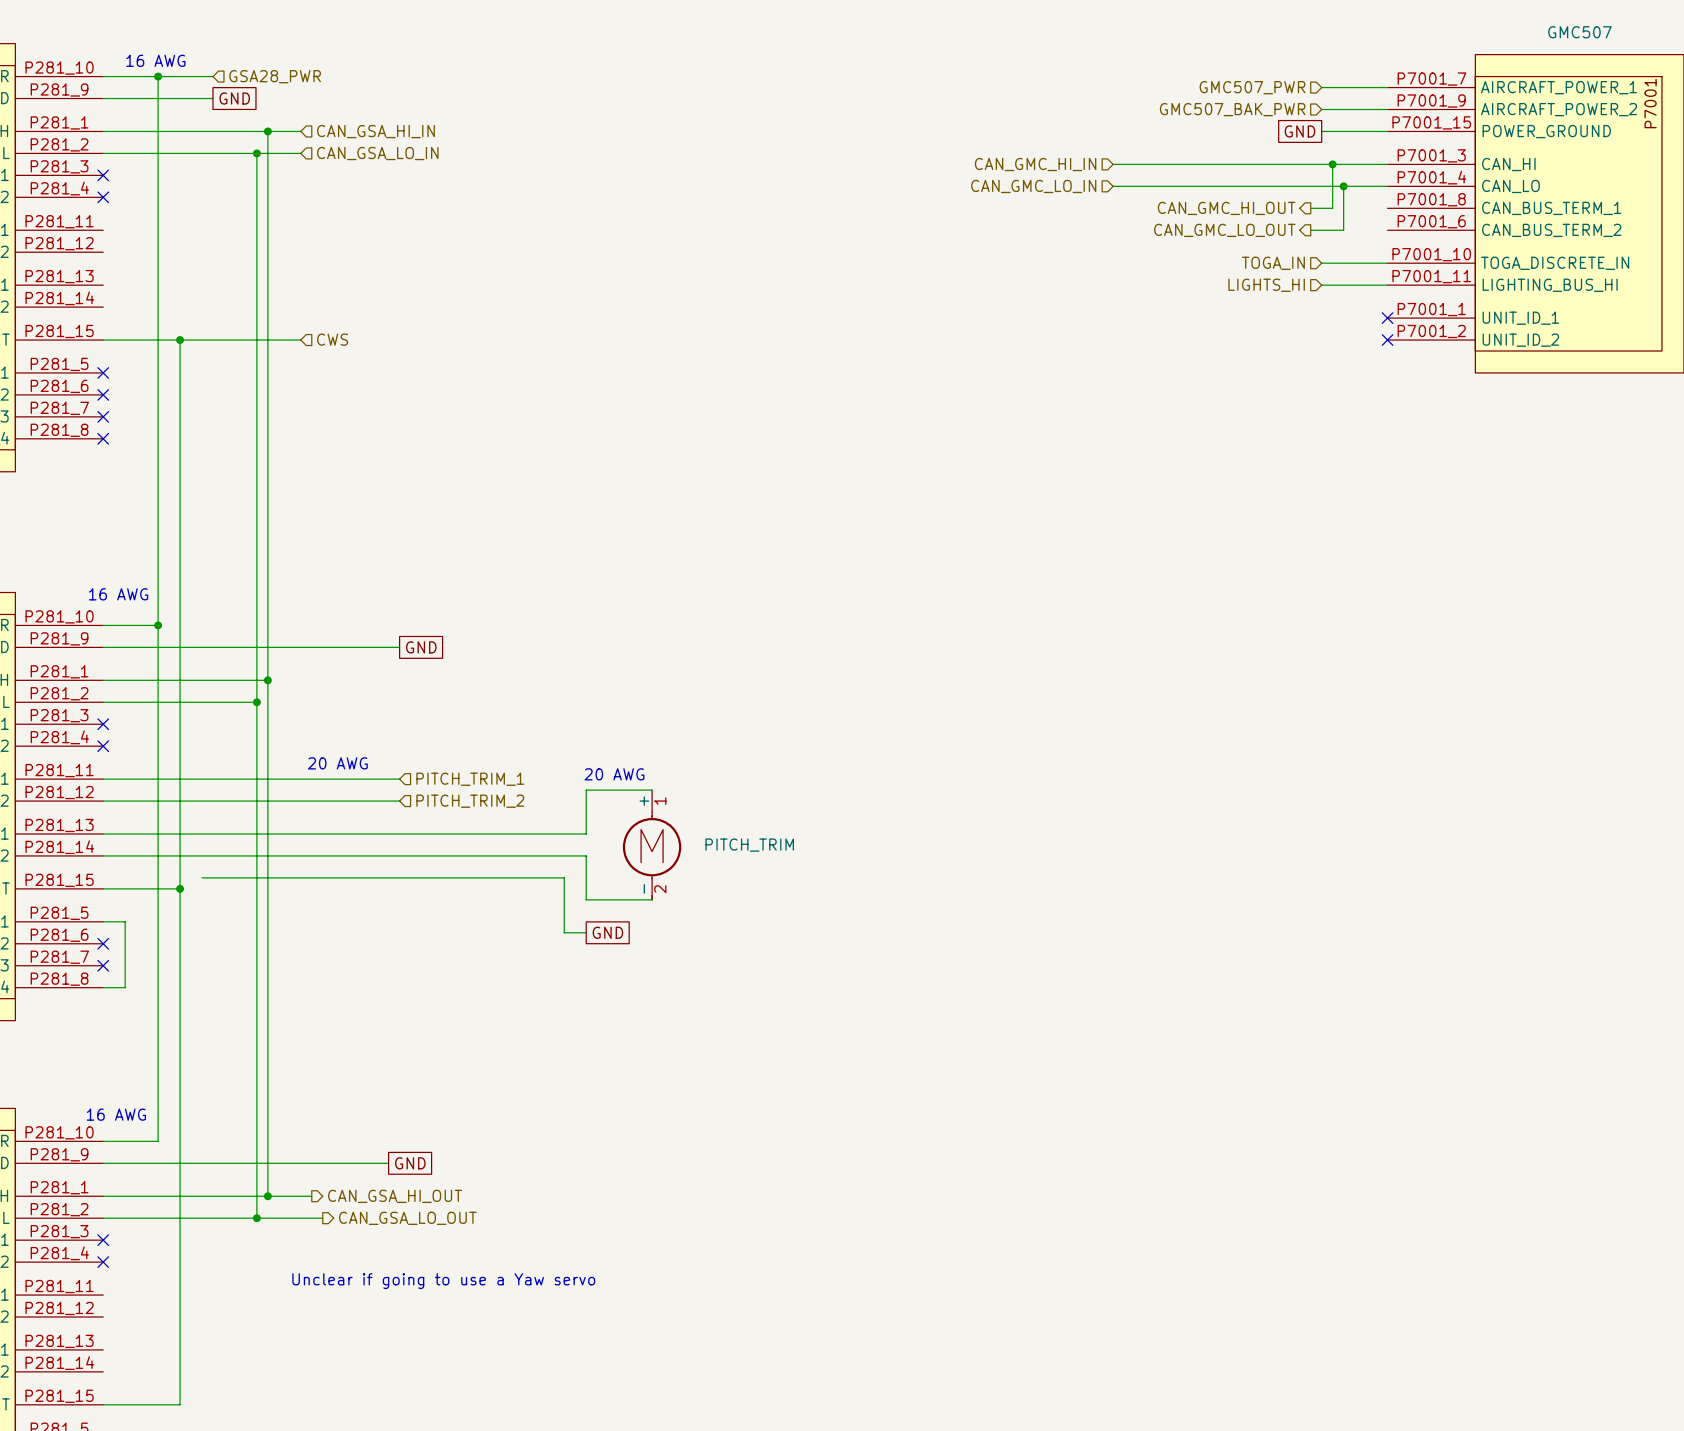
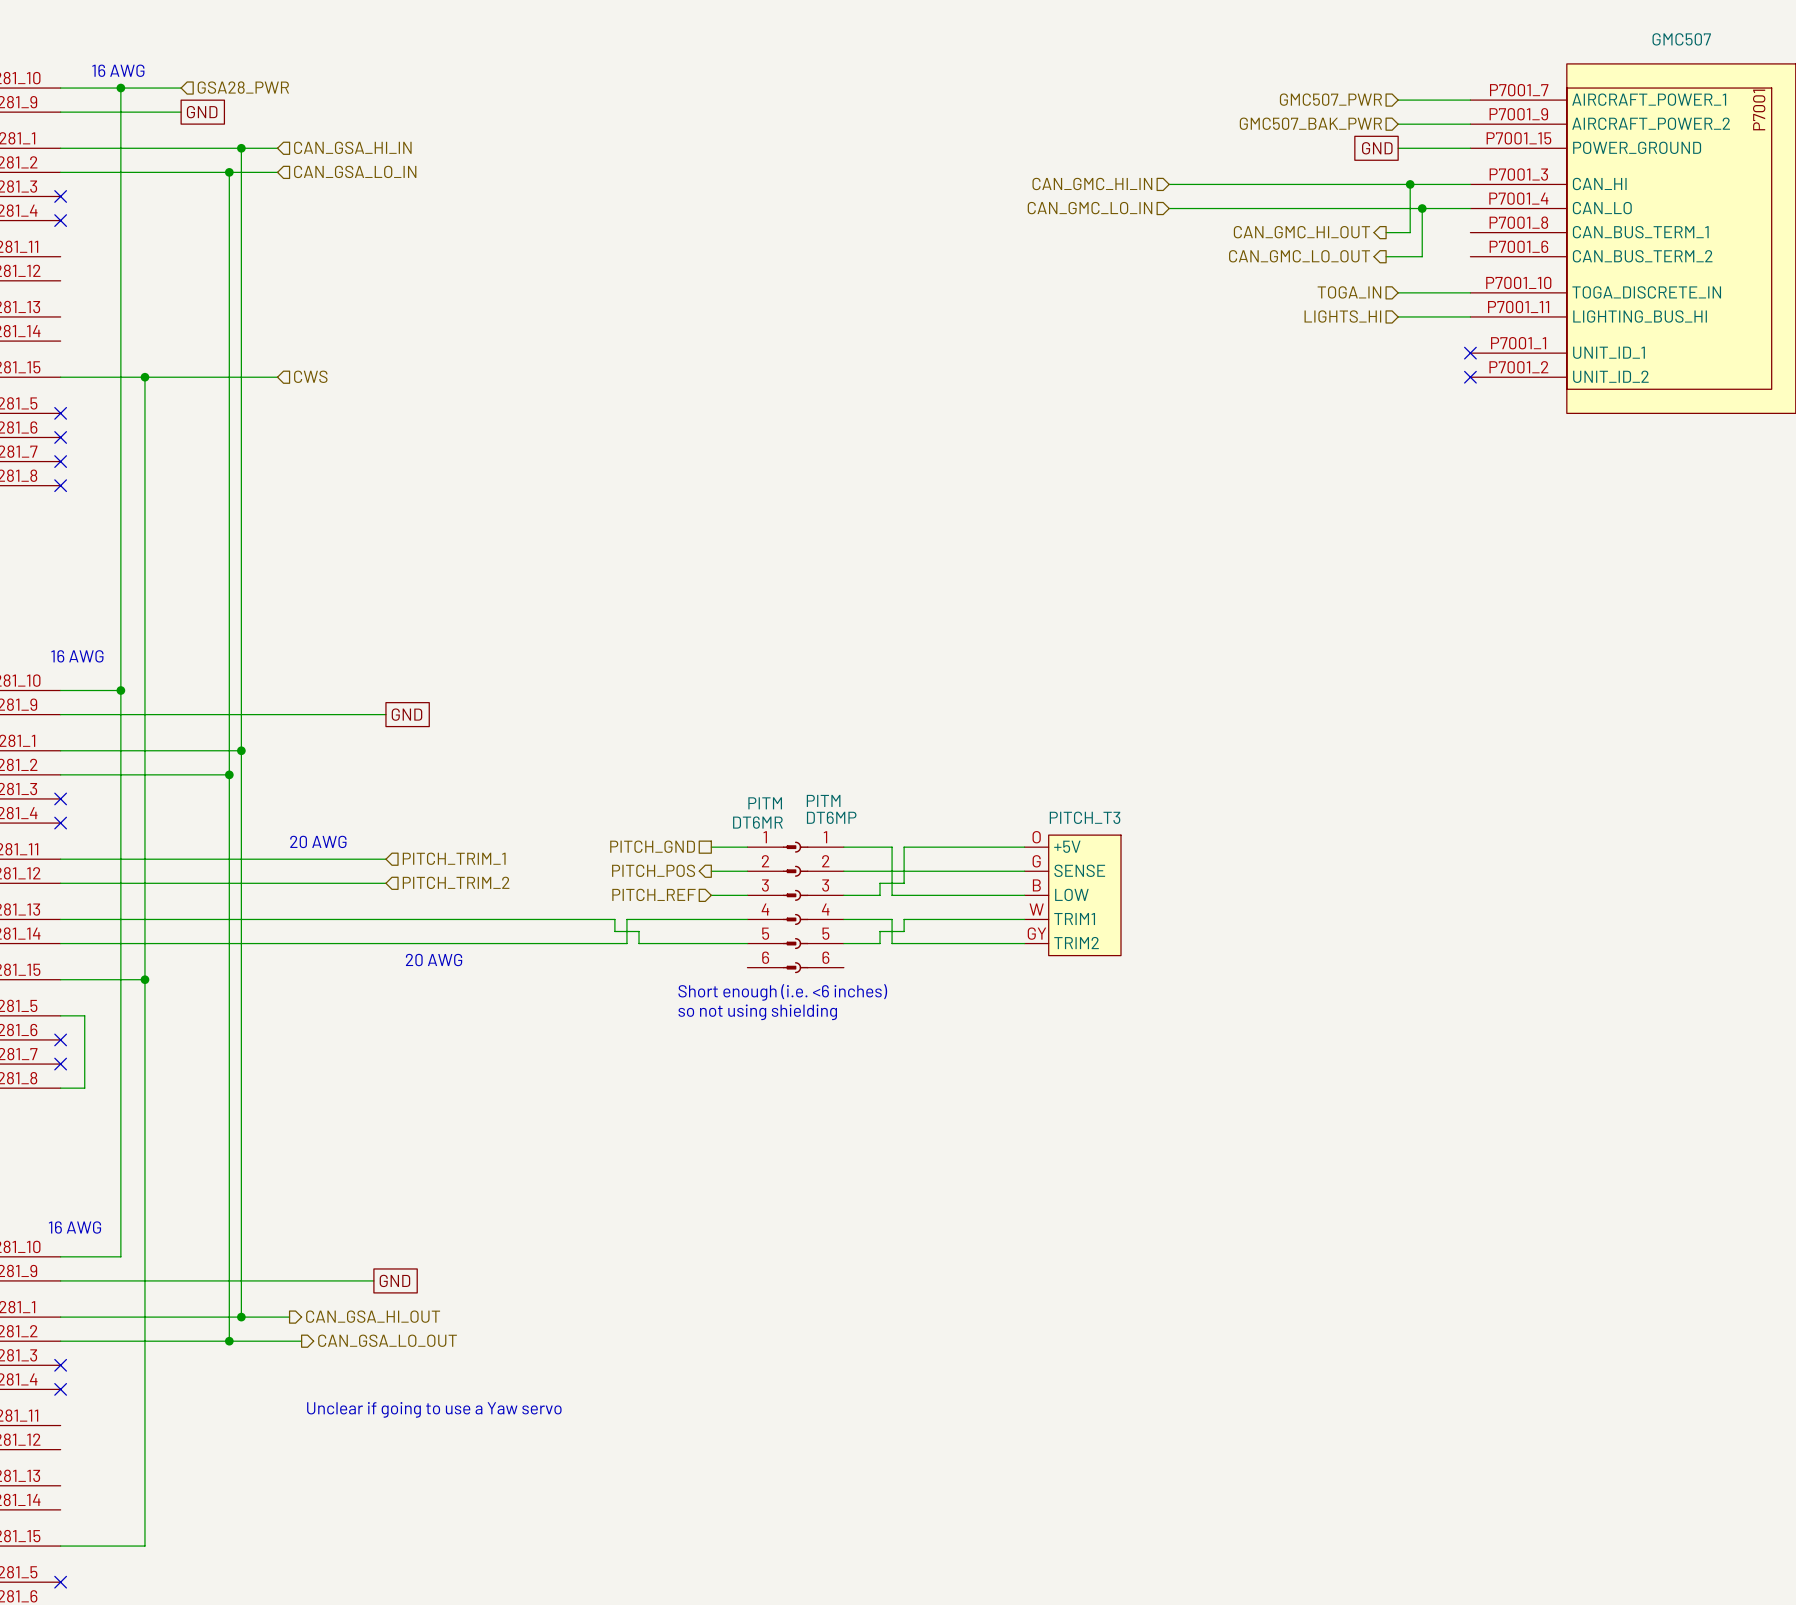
hierarchical label: none -> PITCH_GND (652, 846)
wire: none -> (711, 847) (747, 847)
wire: none -> (843, 847) (892, 847) (892, 895) (1024, 895)
wire: none -> (1024, 847) (904, 847) (904, 883) (880, 883) (880, 895) (843, 895)
text position: 20 AWG (614, 774) -> 20 AWG (434, 960)
hierarchical label: none -> PITCH_POS (653, 870)
wire: (652, 790) (586, 790) (586, 834) -> (747, 943) (639, 943) (639, 931) (614, 931) (614, 919) (590, 919)
wire: none -> (711, 871) (747, 871)
wire: none -> (843, 871) (1024, 871)
hierarchical label: none -> PITCH_REF (653, 894)
wire: none -> (711, 895) (747, 895)
PITCH_T3: none -> (1072, 895)
PITM: none -> DT6MR (771, 907)
PITM: none -> DT6MP (819, 907)
wire: none -> (843, 919) (892, 919) (892, 943) (1024, 943)
wire: none -> (1024, 919) (904, 919) (904, 931) (880, 931) (880, 943) (843, 943)
PITCH_TRIM: (652, 844) -> none
wire: (586, 855) (586, 899) (652, 899) -> (590, 943) (626, 943) (626, 919) (747, 919)
wire: (202, 877) (564, 877) (564, 932) (586, 932) -> none
text: none -> Short enough (i.e. <6 inches) (782, 992)
text: none -> so not using shielding (757, 1012)
global label: GND (607, 932) -> none

